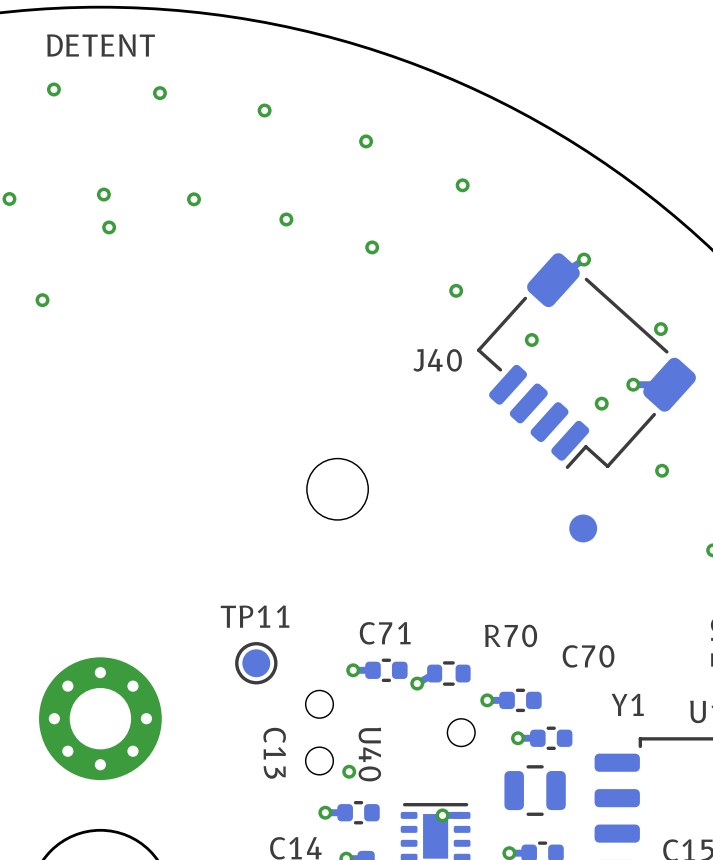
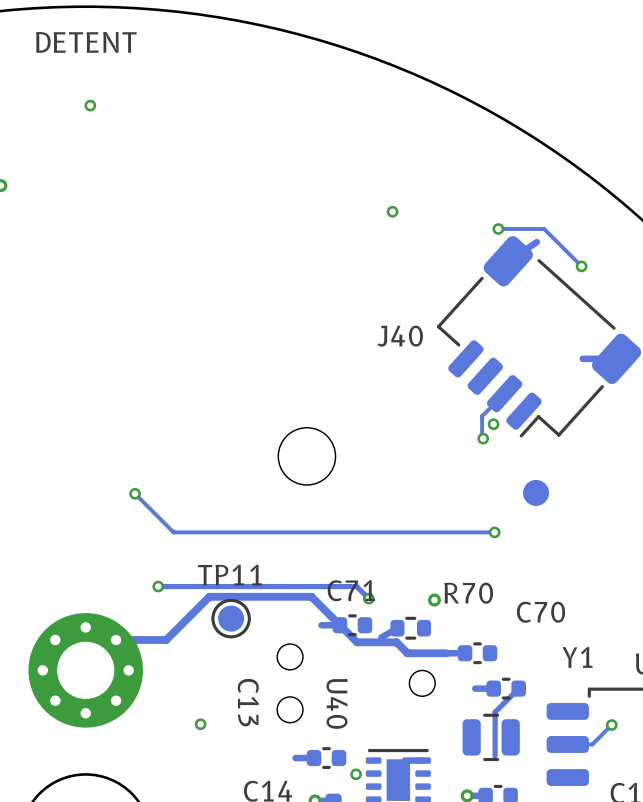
via: (53, 89) -> none
via: (159, 93) -> none
via: (264, 110) -> none
via: none -> (90, 105)
via: (366, 141) -> none
via: (462, 185) -> none
via: (103, 194) -> none
via: (194, 199) -> none
via: (286, 219) -> none
via: (109, 227) -> none
via: none -> (392, 211)
track: none -> (498, 229) (544, 229) (581, 266)
via: none -> (498, 229)
via: (372, 247) -> none
via: (584, 259) -> none
via: none -> (581, 266)
via: (456, 290) -> none
via: (42, 300) -> none
via: (660, 329) -> none
via: (531, 340) -> none
via: (633, 384) -> none
via: (601, 403) -> none
track: none -> (504, 393) (482, 416) (483, 438)
via: none -> (493, 424)
via: none -> (483, 438)
via: (662, 470) -> none
track: none -> (135, 493) (173, 532) (494, 532)
via: none -> (135, 493)
via: none -> (494, 532)
track: none -> (158, 586) (356, 586) (368, 598)
via: none -> (158, 586)
via: none -> (368, 598)
via: none -> (434, 600)
via: (353, 670) -> none
via: (417, 683) -> none
track: none -> (116, 639) (166, 639) (209, 596) (311, 596) (357, 642) (396, 642) (407, 653) (446, 653)
via: (487, 700) -> none
via: (518, 738) -> none
track: none -> (518, 688) (495, 712) (495, 755)
via: (349, 771) -> none
via: none -> (200, 724)
track: none -> (611, 725) (592, 744) (567, 744)
via: none -> (611, 725)
via: (325, 812) -> none
via: (442, 815) -> none
via: none -> (356, 774)

